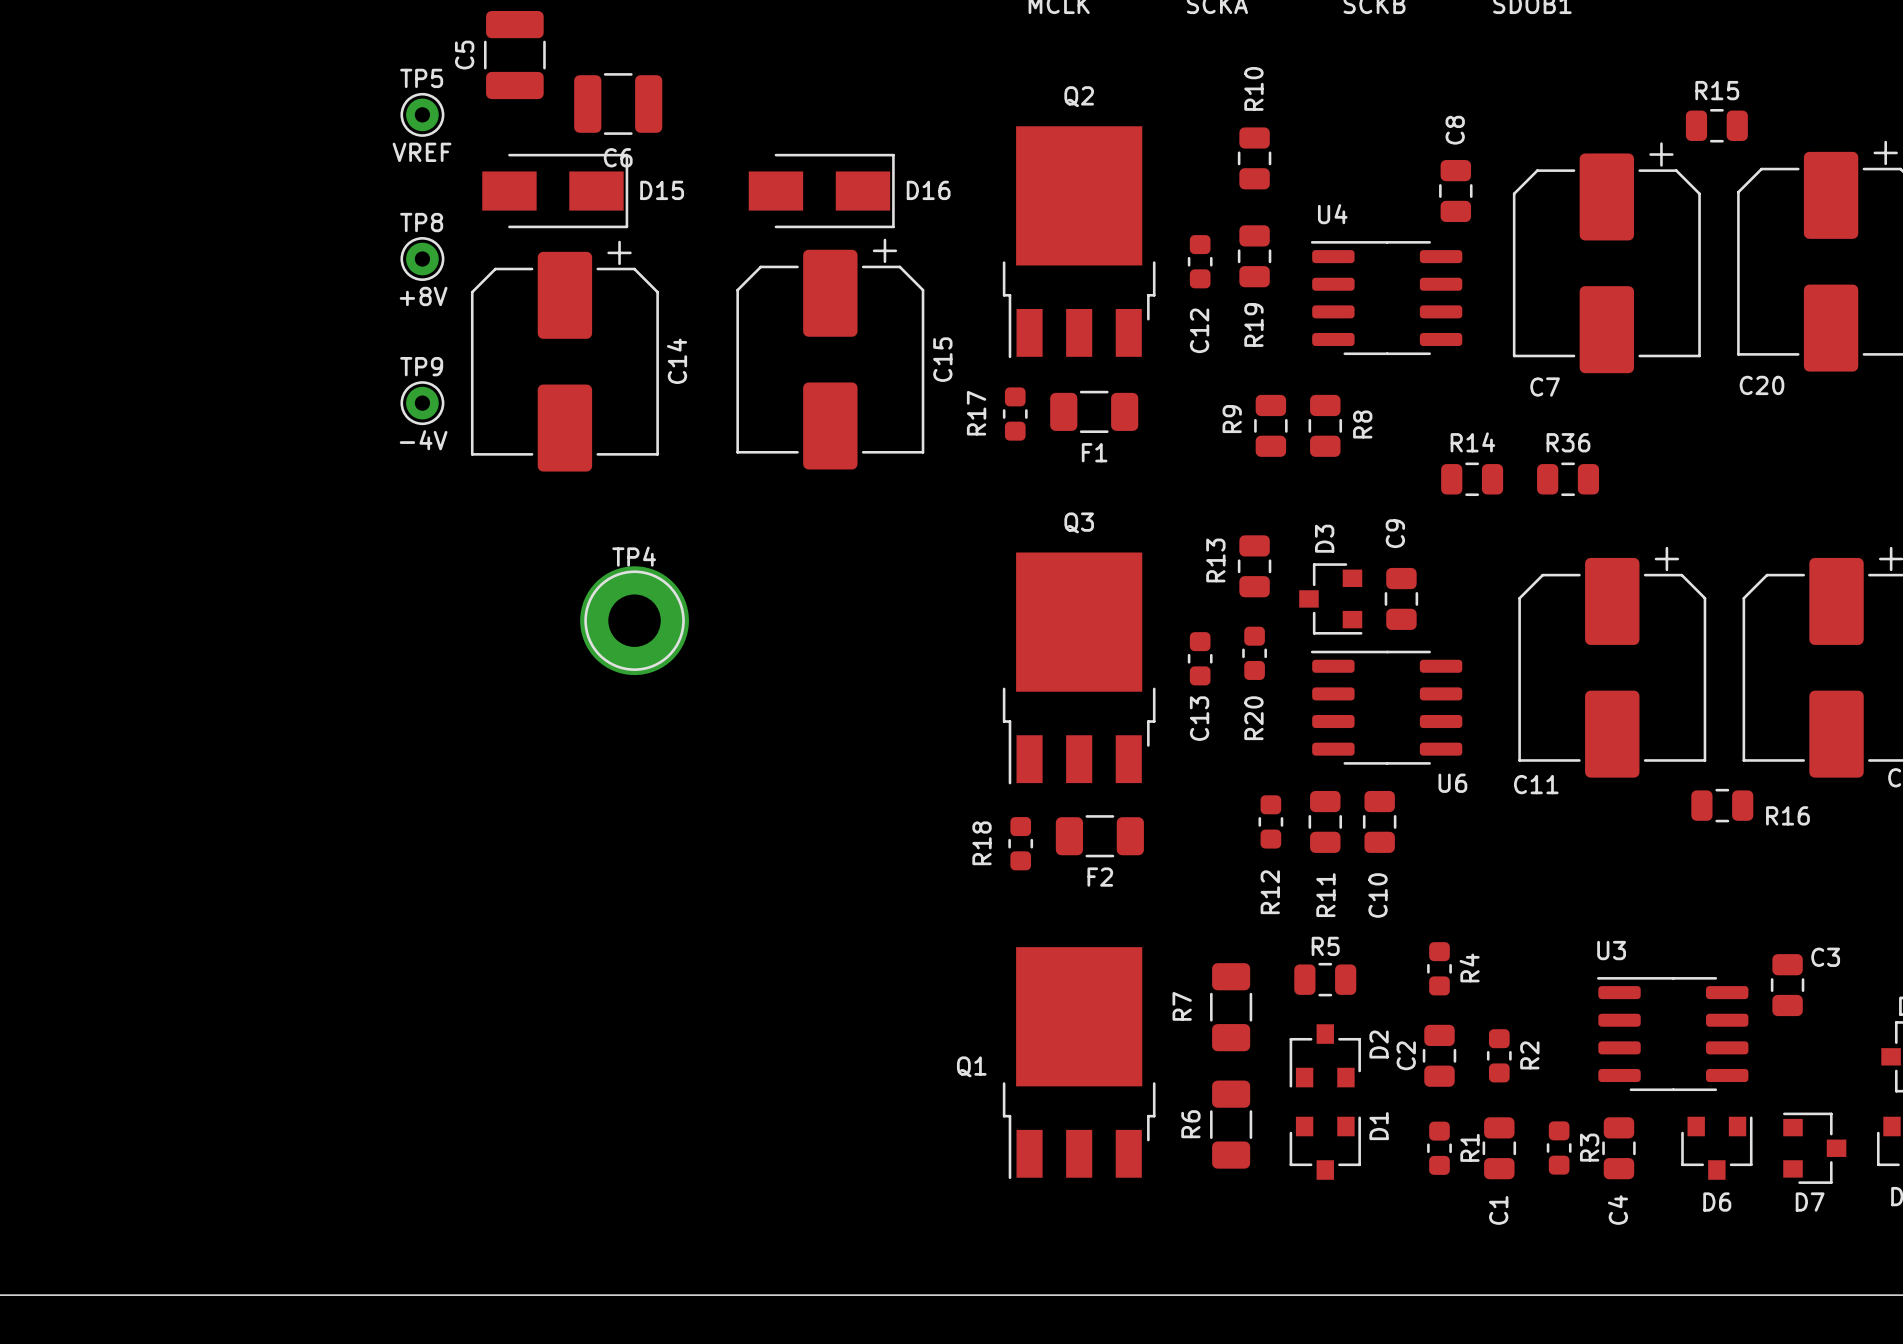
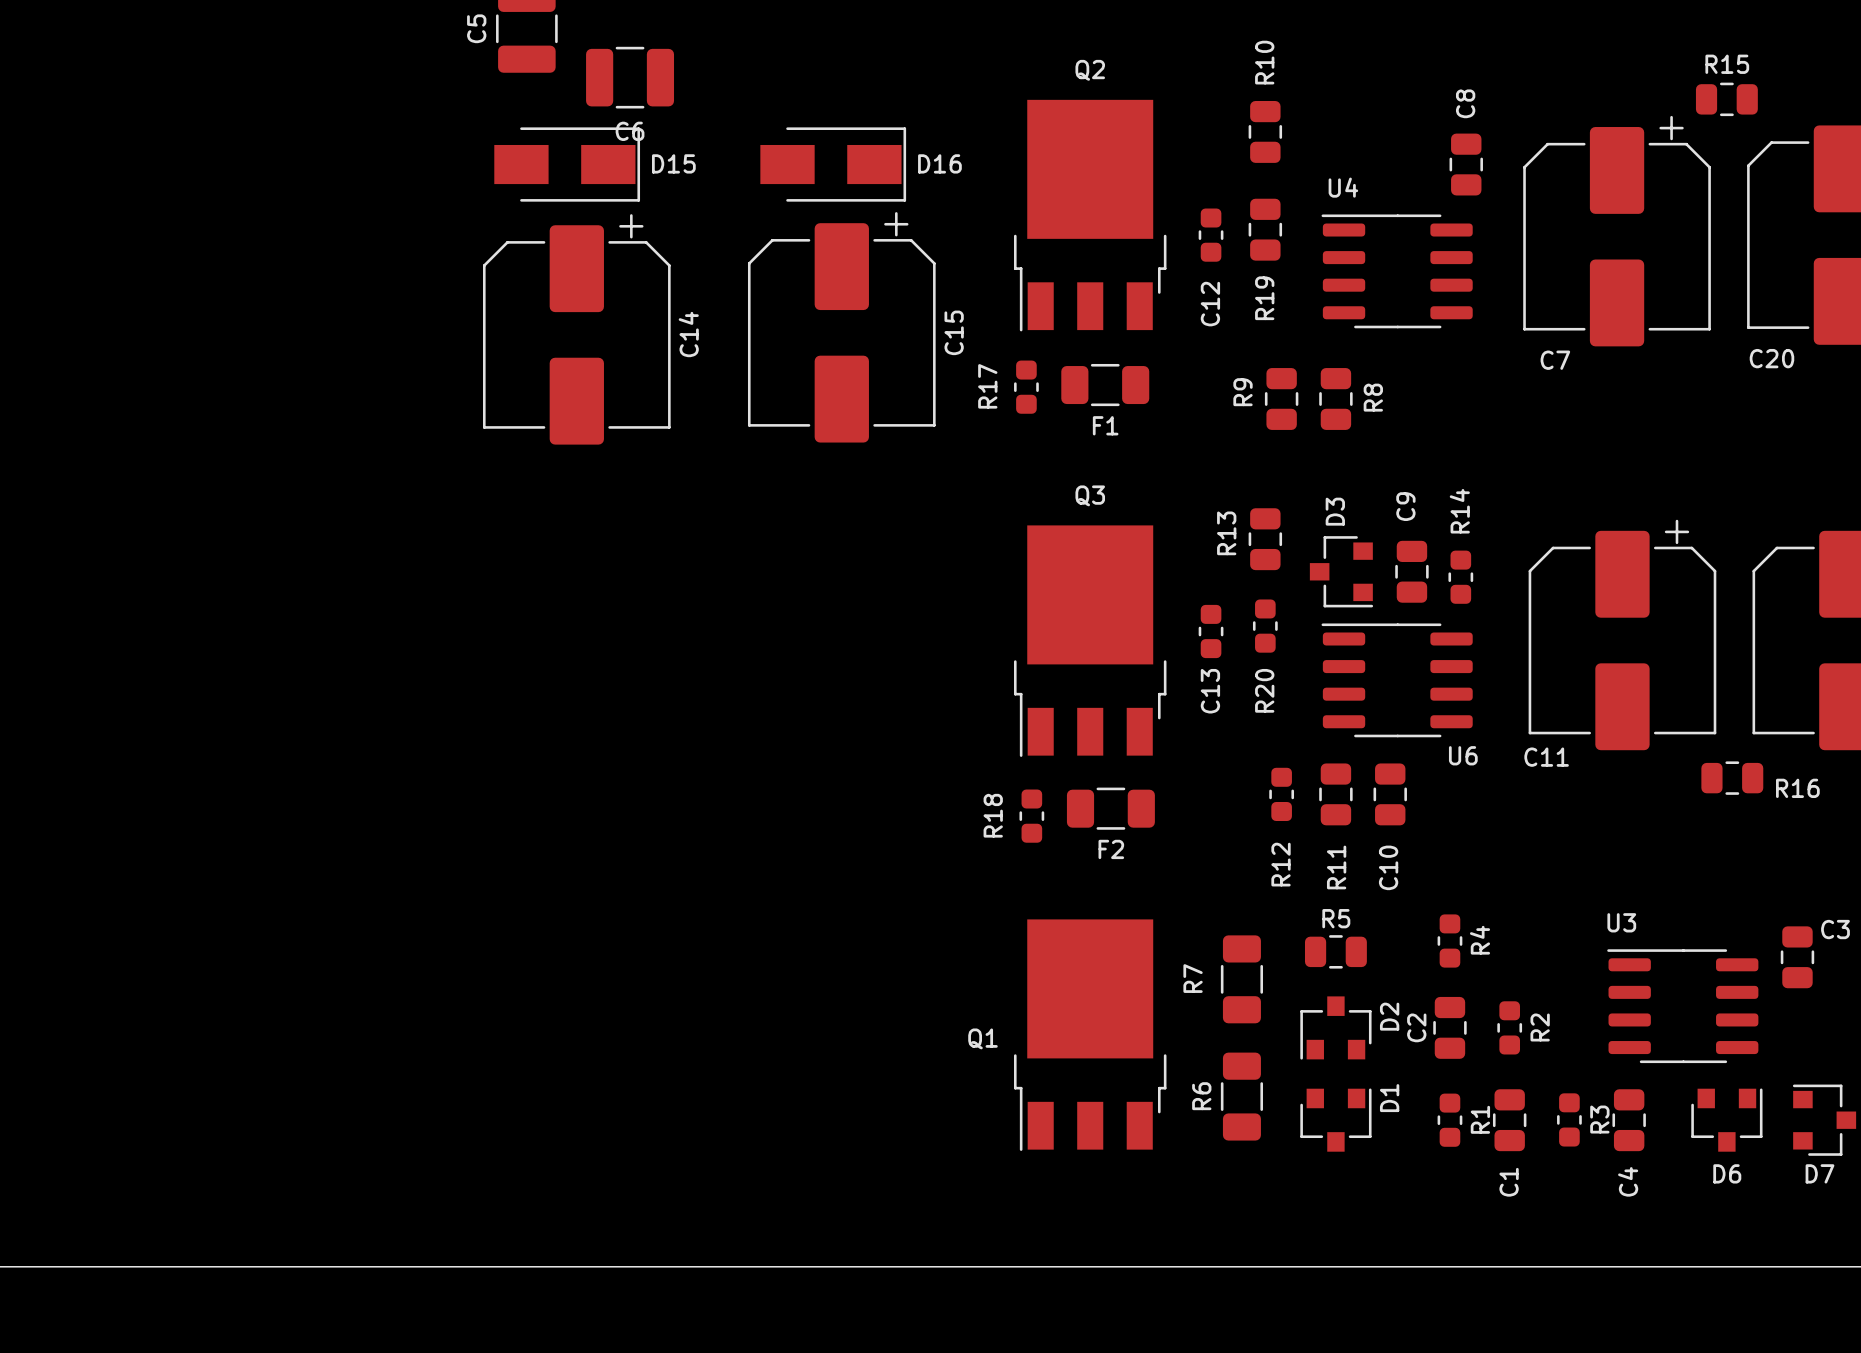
TP5: VREF (422, 114) -> none
TP8: +8V (422, 259) -> none
TP9: -4V (422, 403) -> none
R14 footprint: [1441, 462, 1504, 497] -> [1448, 550, 1474, 604]
R36: (1568, 479) -> none
TP4: (634, 620) -> none

